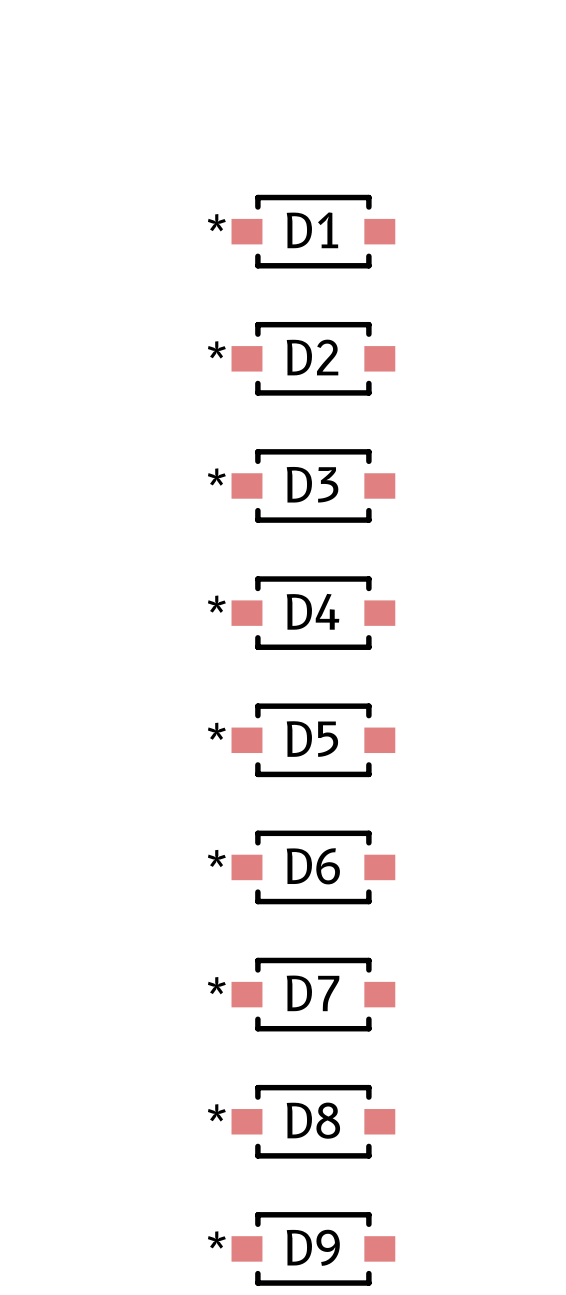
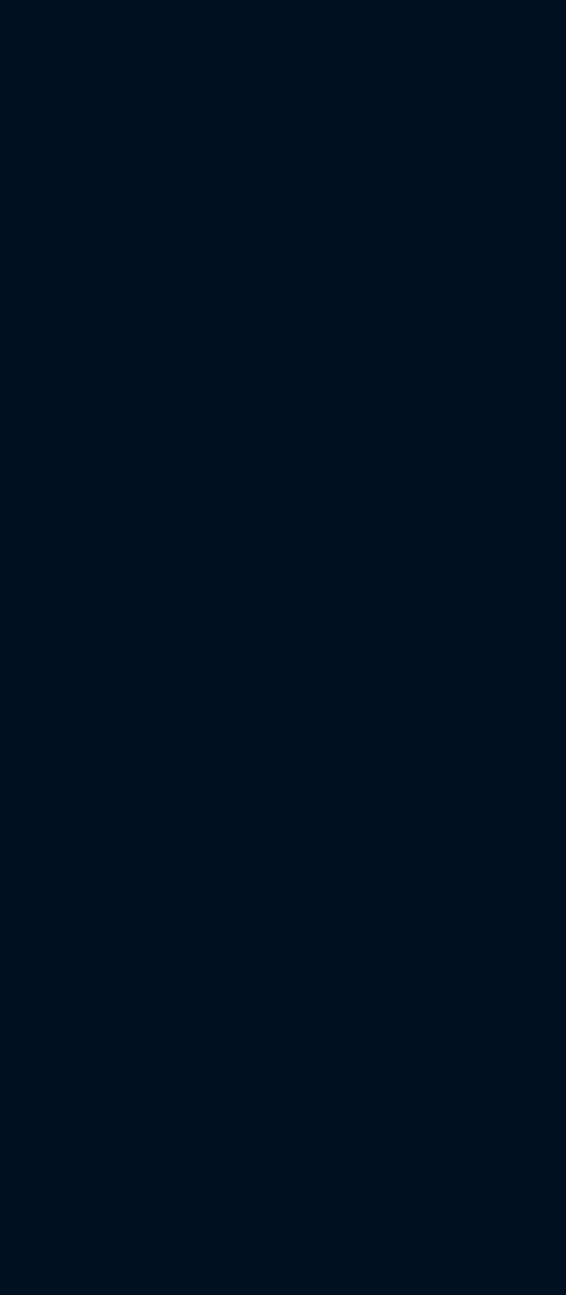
D1: (313, 231) -> none
D2: (313, 358) -> none
D3: (313, 485) -> none
D4: (313, 613) -> none
D5: (313, 740) -> none
D6: (313, 867) -> none
D7: (313, 994) -> none
D8: (313, 1121) -> none
D9: (313, 1248) -> none

